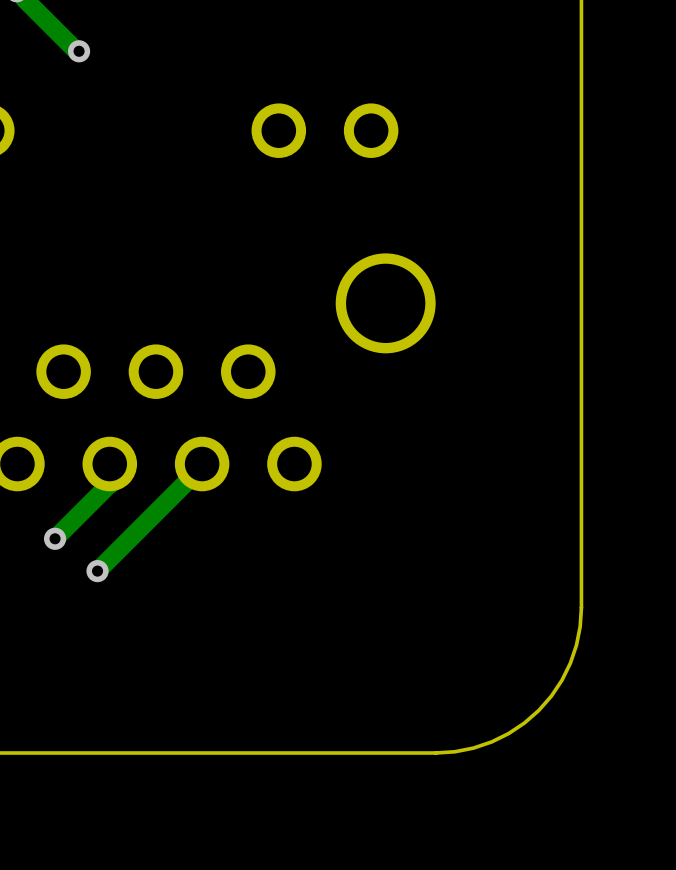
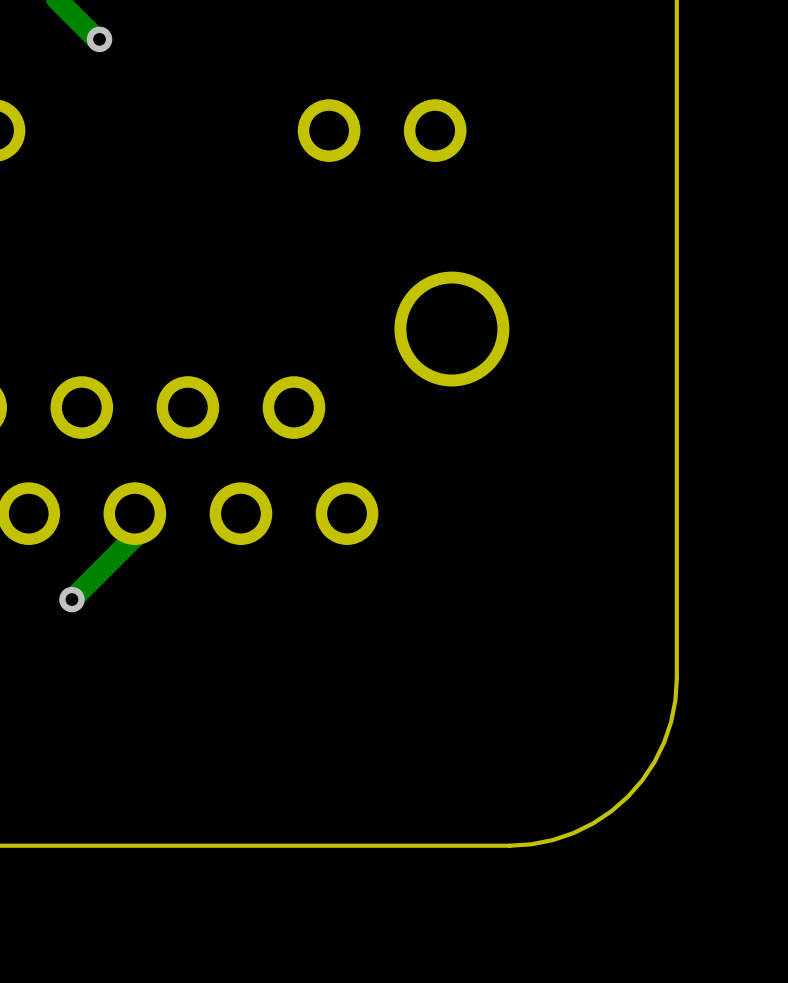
track: (202, 464) (202, 466) (97, 571) -> none
via: (97, 571) -> none

